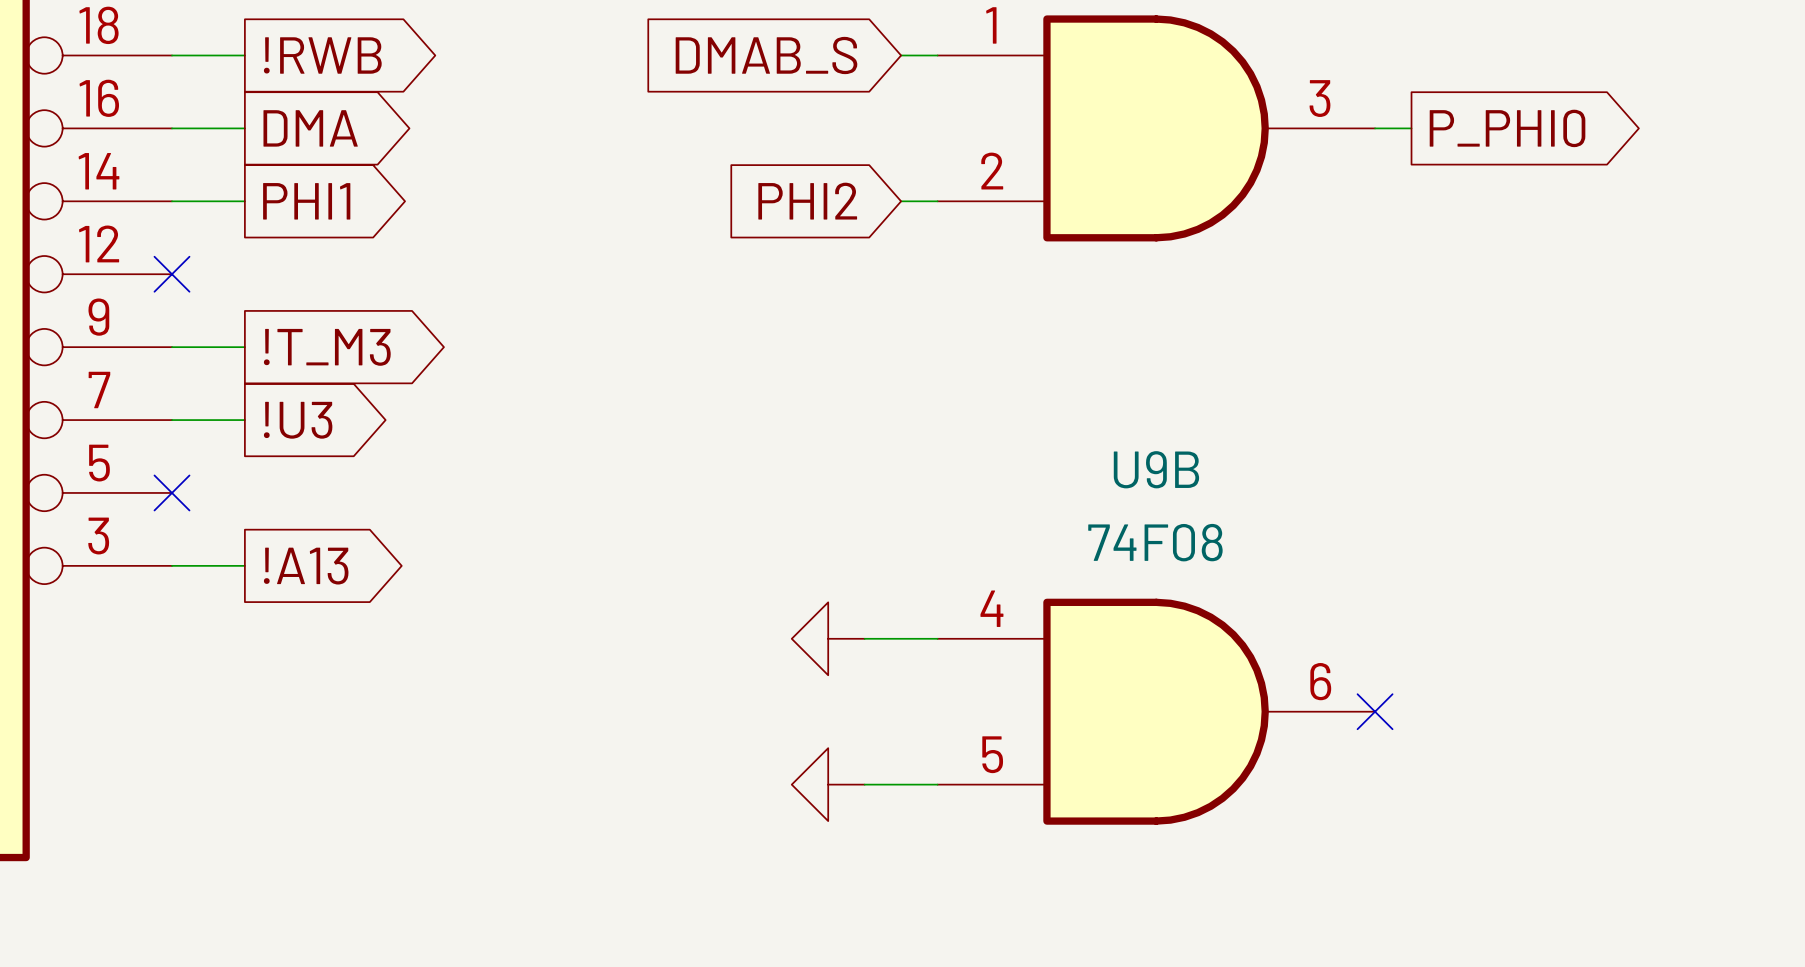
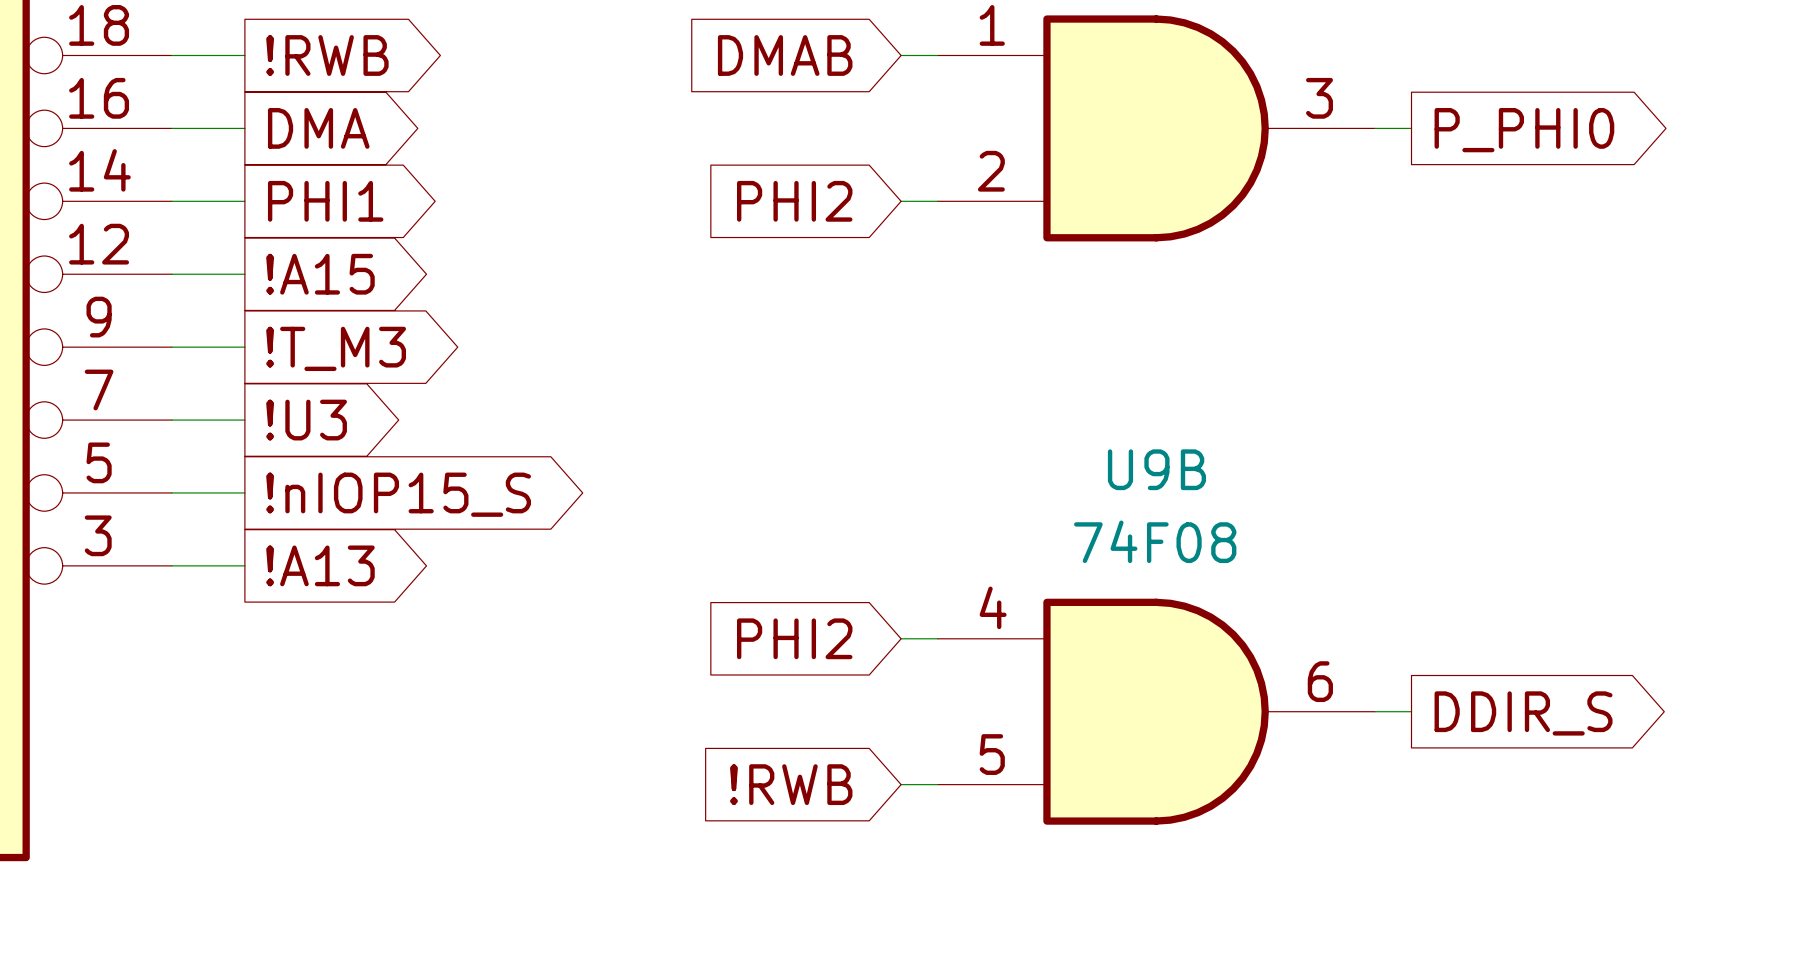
global label: DMAB_S (766, 55) -> DMAB (785, 55)
wire: none -> (171, 274) (244, 274)
no-connect mark: (171, 274) -> none
global label: none -> !A15 (320, 274)
wire: none -> (171, 492) (244, 492)
no-connect mark: (171, 492) -> none
global label: none -> !nIOP15_S (398, 494)
global label: none -> PHI2 (794, 638)
power symbol: (828, 638) -> none
wire: (864, 638) (901, 638) -> (1375, 711) (1411, 711)
no-connect mark: (1375, 711) -> none
global label: none -> DDIR_S (1523, 713)
global label: none -> !RWB (791, 784)
power symbol: (828, 784) -> none
wire: (864, 784) (901, 784) -> none

